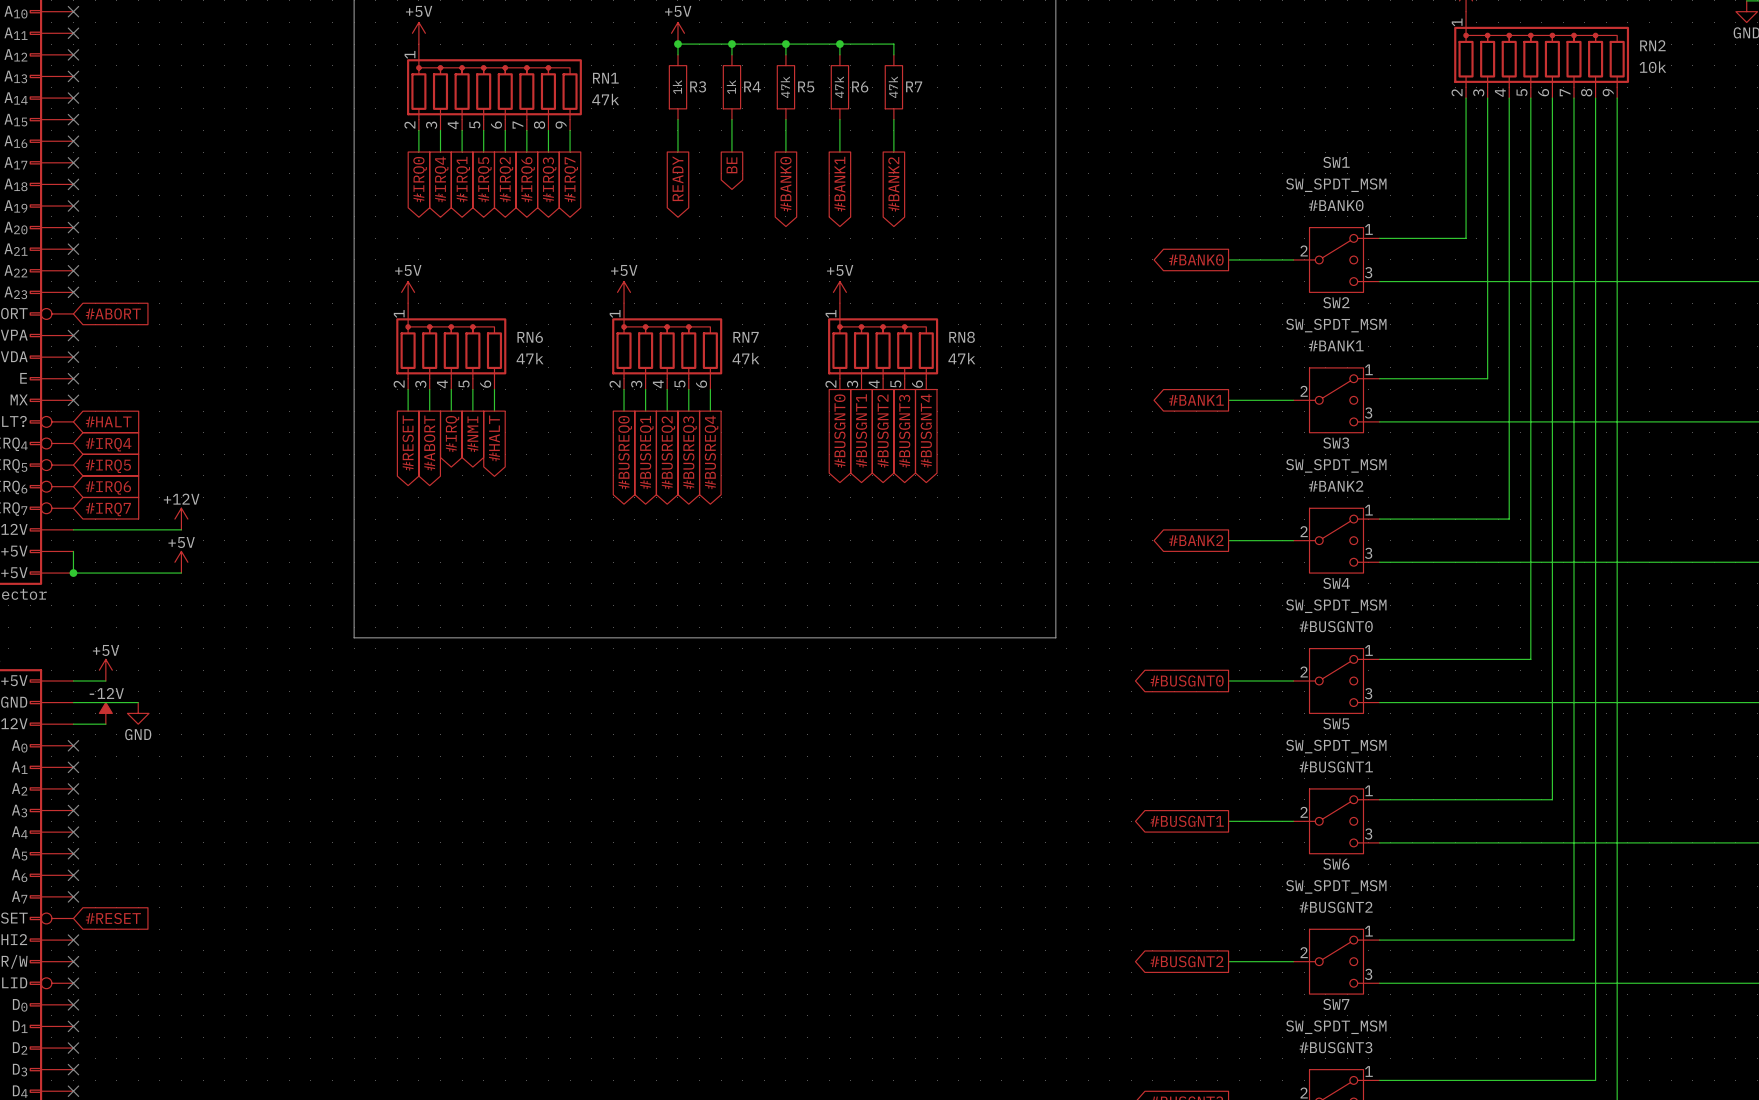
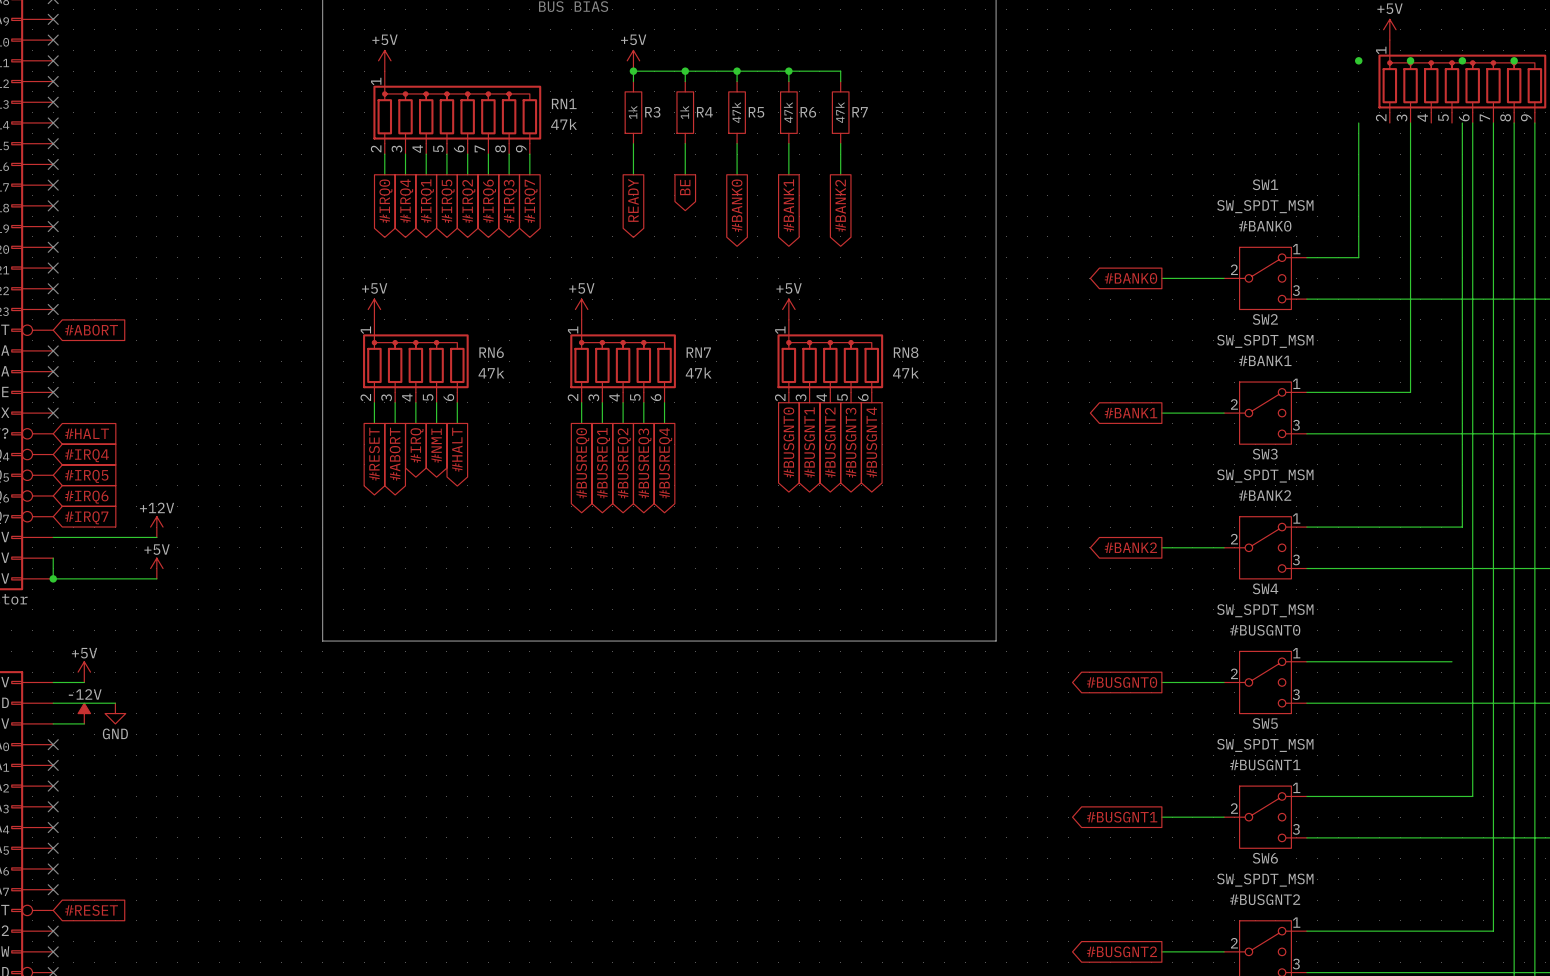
junction: none -> (1358, 60)
junction: none -> (1410, 60)
junction: none -> (1462, 60)
junction: none -> (1514, 60)
wire: (1466, 98) (1466, 238) (1433, 238) -> (1358, 122) (1358, 257)
wire: (1509, 98) (1509, 519) -> (1462, 122) (1462, 527) (1431, 527)
wire: (1530, 98) (1530, 659) -> none

